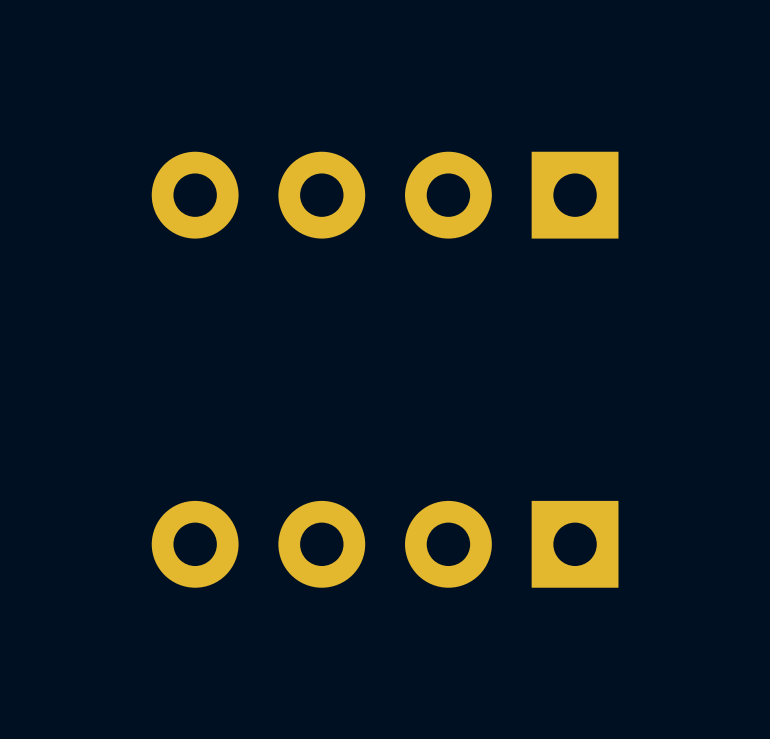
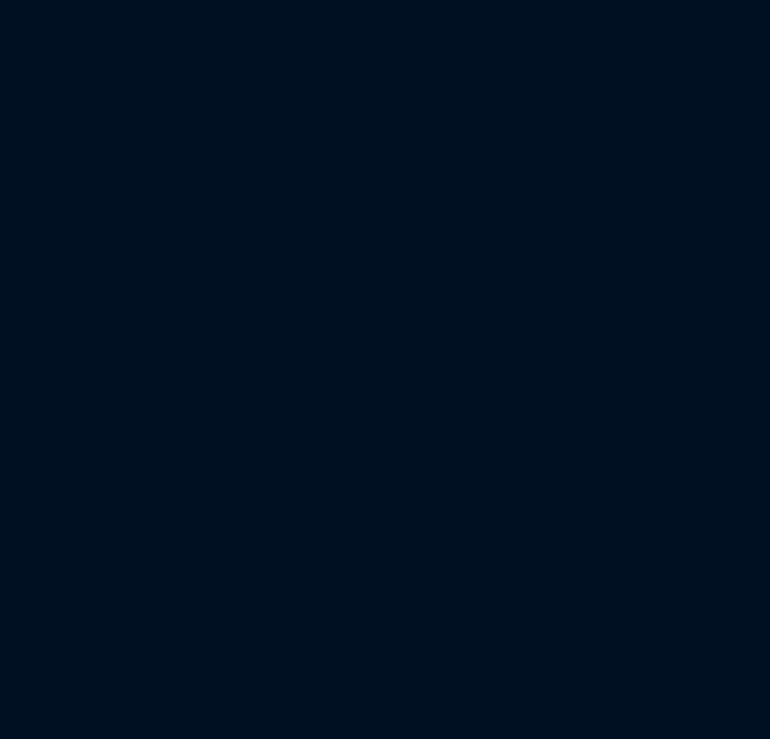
part: (385, 195) -> none
part: (385, 544) -> none

